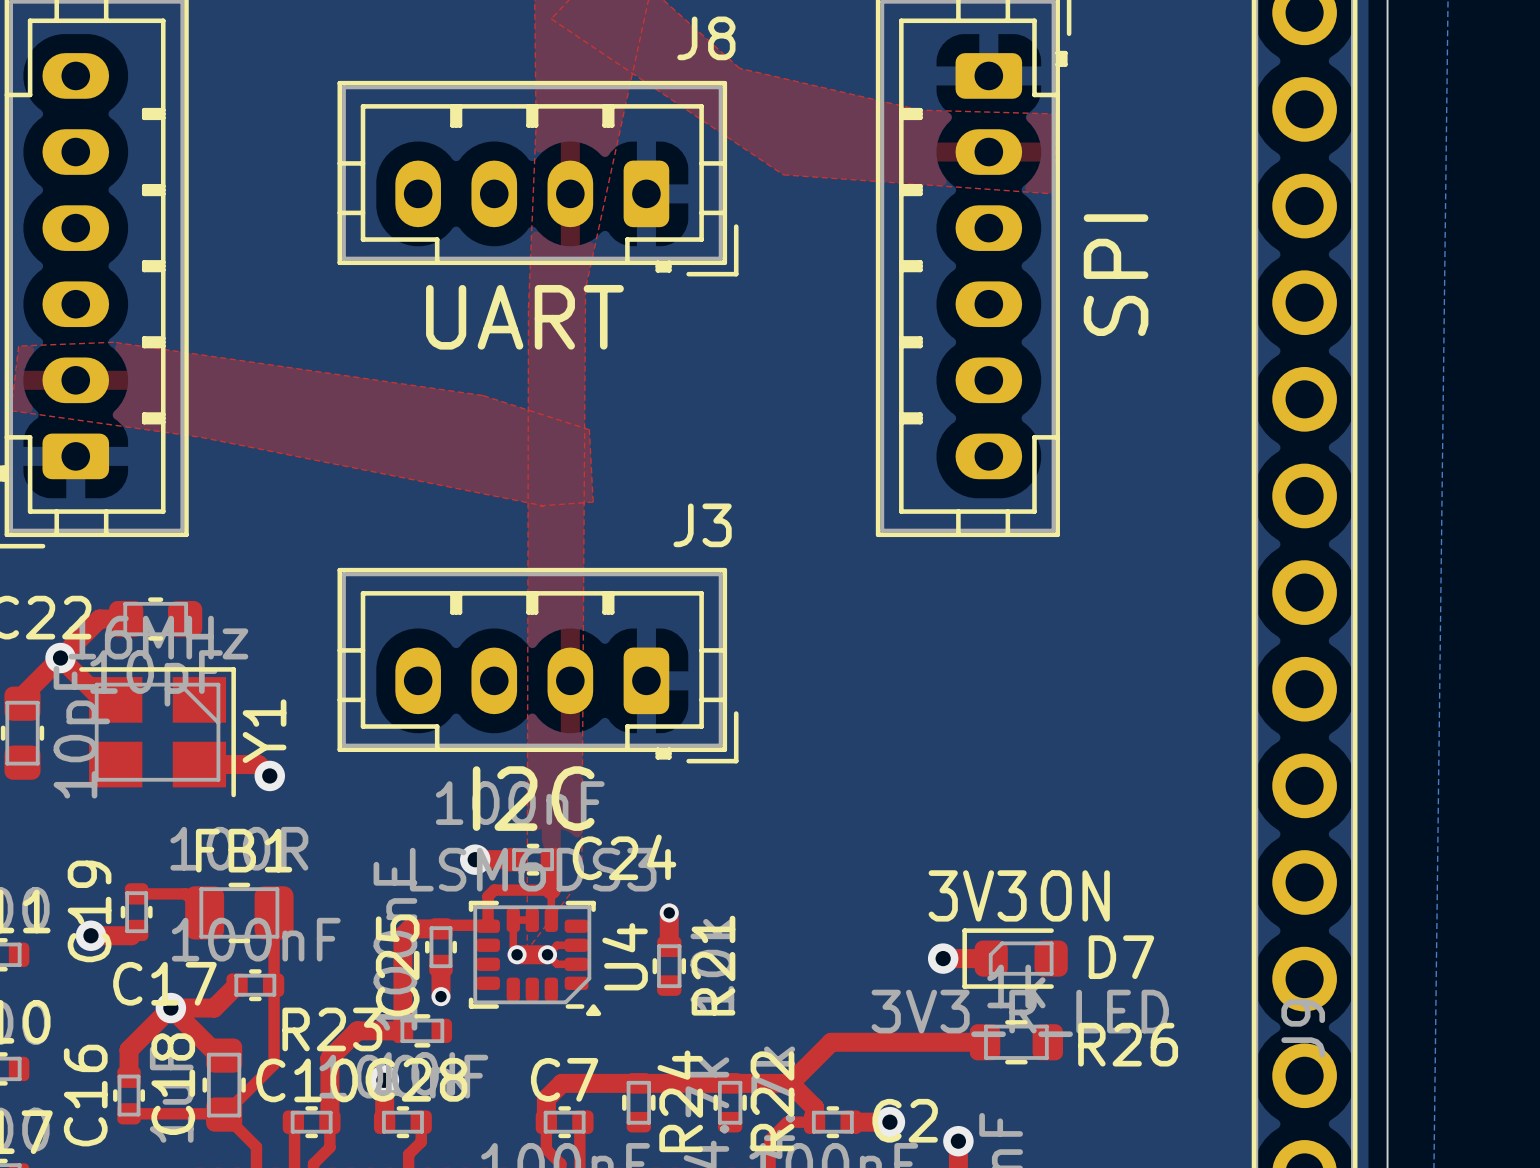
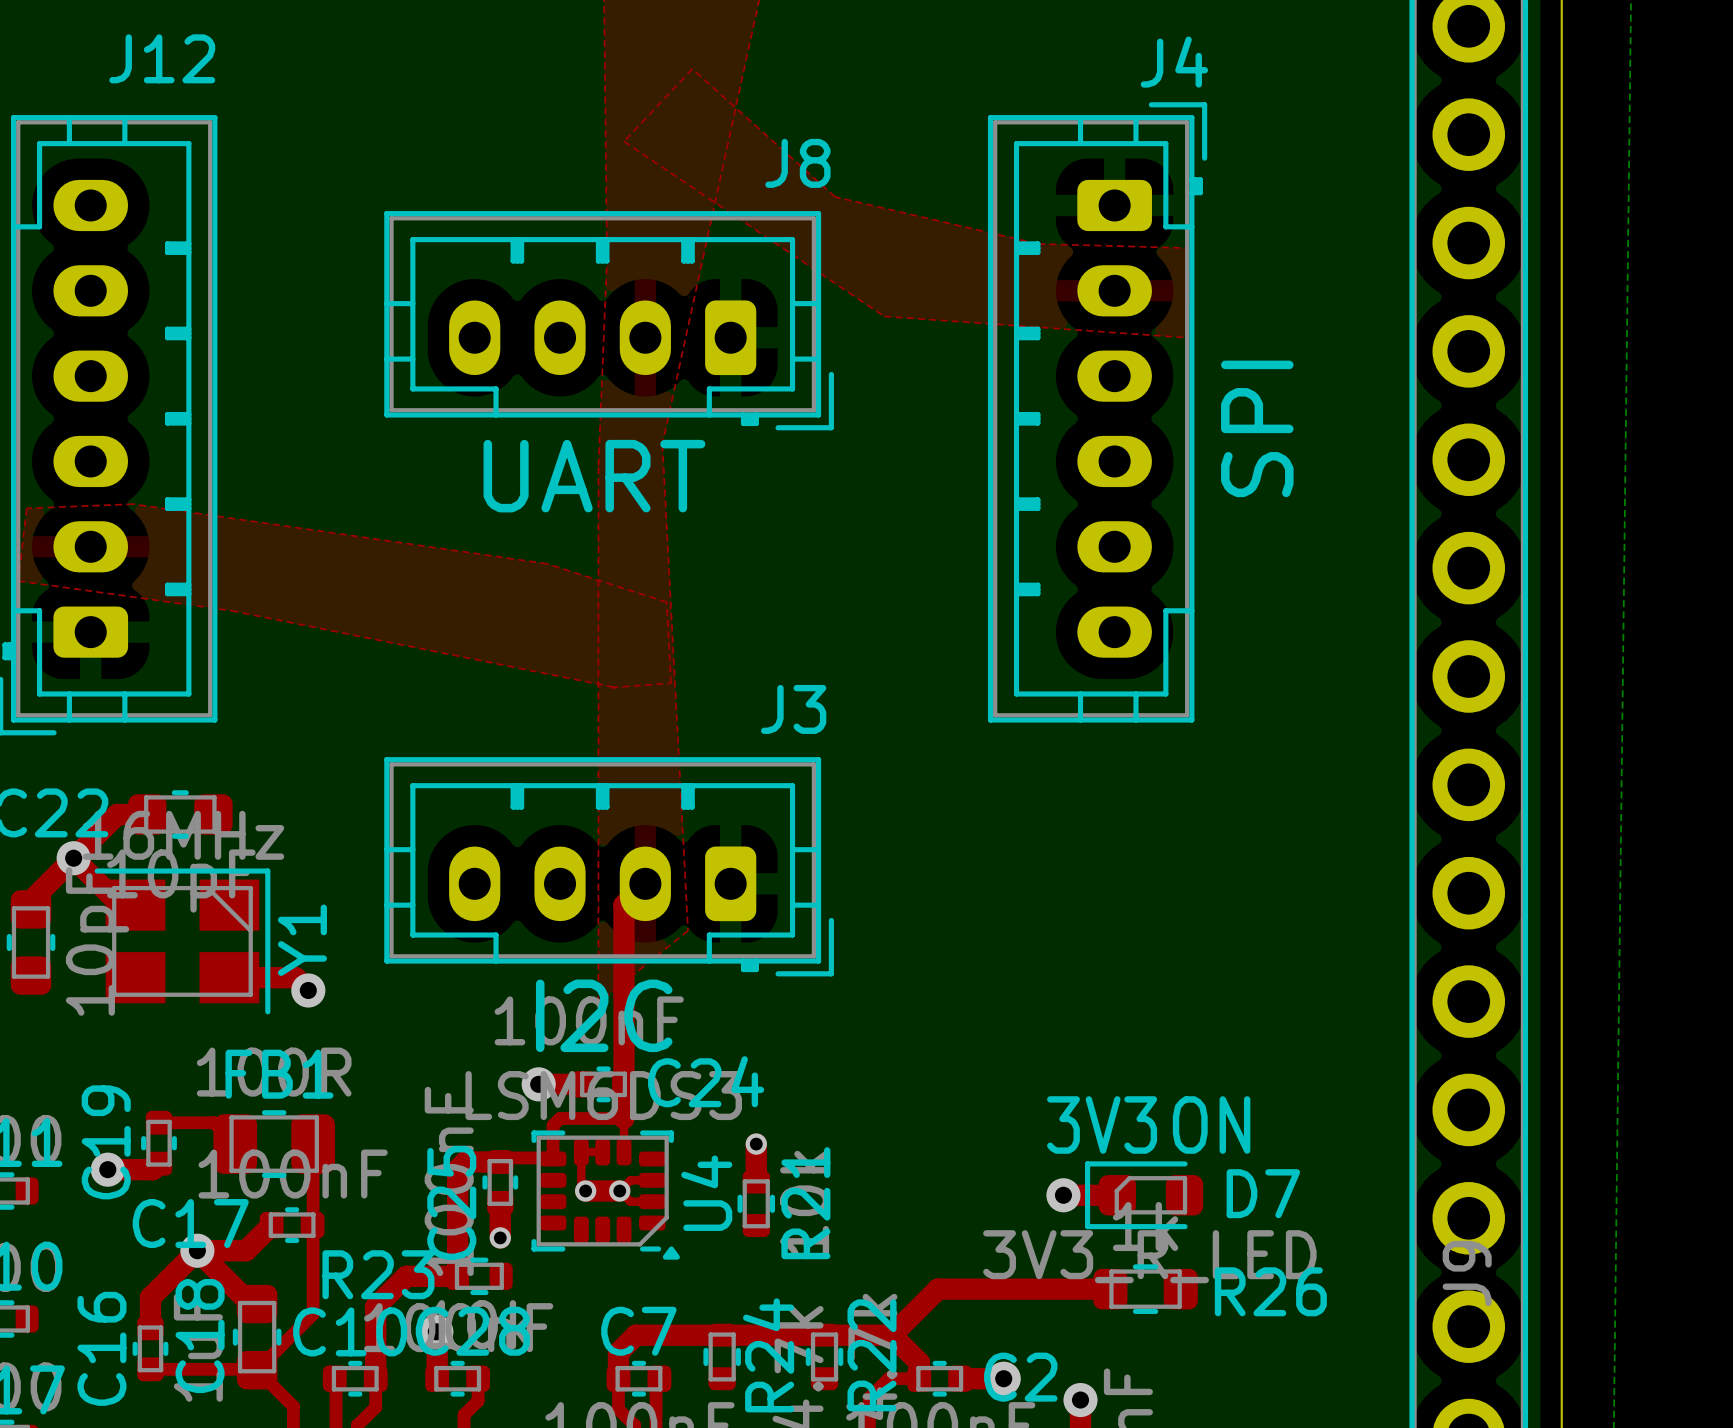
top zone outline: (585, 288) (581, 878) (527, 950) (528, 308) -> (662, 444) (688, 930) (598, 1003) (598, 465)
top track: none -> (645, 883) (624, 905) (624, 1084)

